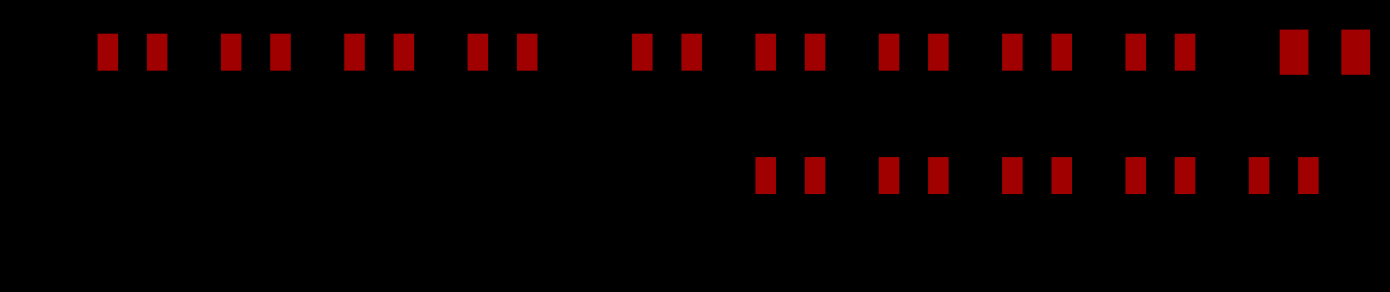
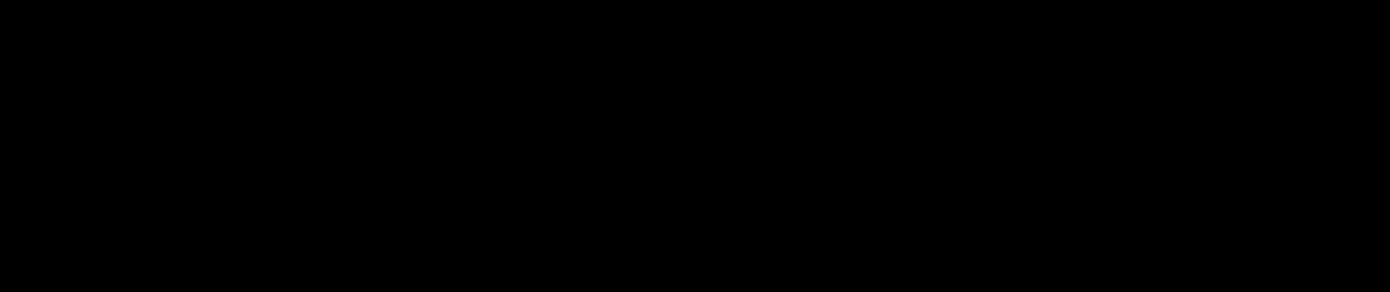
part: (132, 52) -> none
part: (255, 52) -> none
part: (379, 52) -> none
part: (502, 52) -> none
part: (667, 52) -> none
part: (790, 52) -> none
part: (913, 52) -> none
part: (1037, 52) -> none
part: (1160, 52) -> none
part: (1324, 52) -> none
part: (790, 175) -> none
part: (913, 175) -> none
part: (1037, 175) -> none
part: (1160, 175) -> none
part: (1283, 175) -> none

